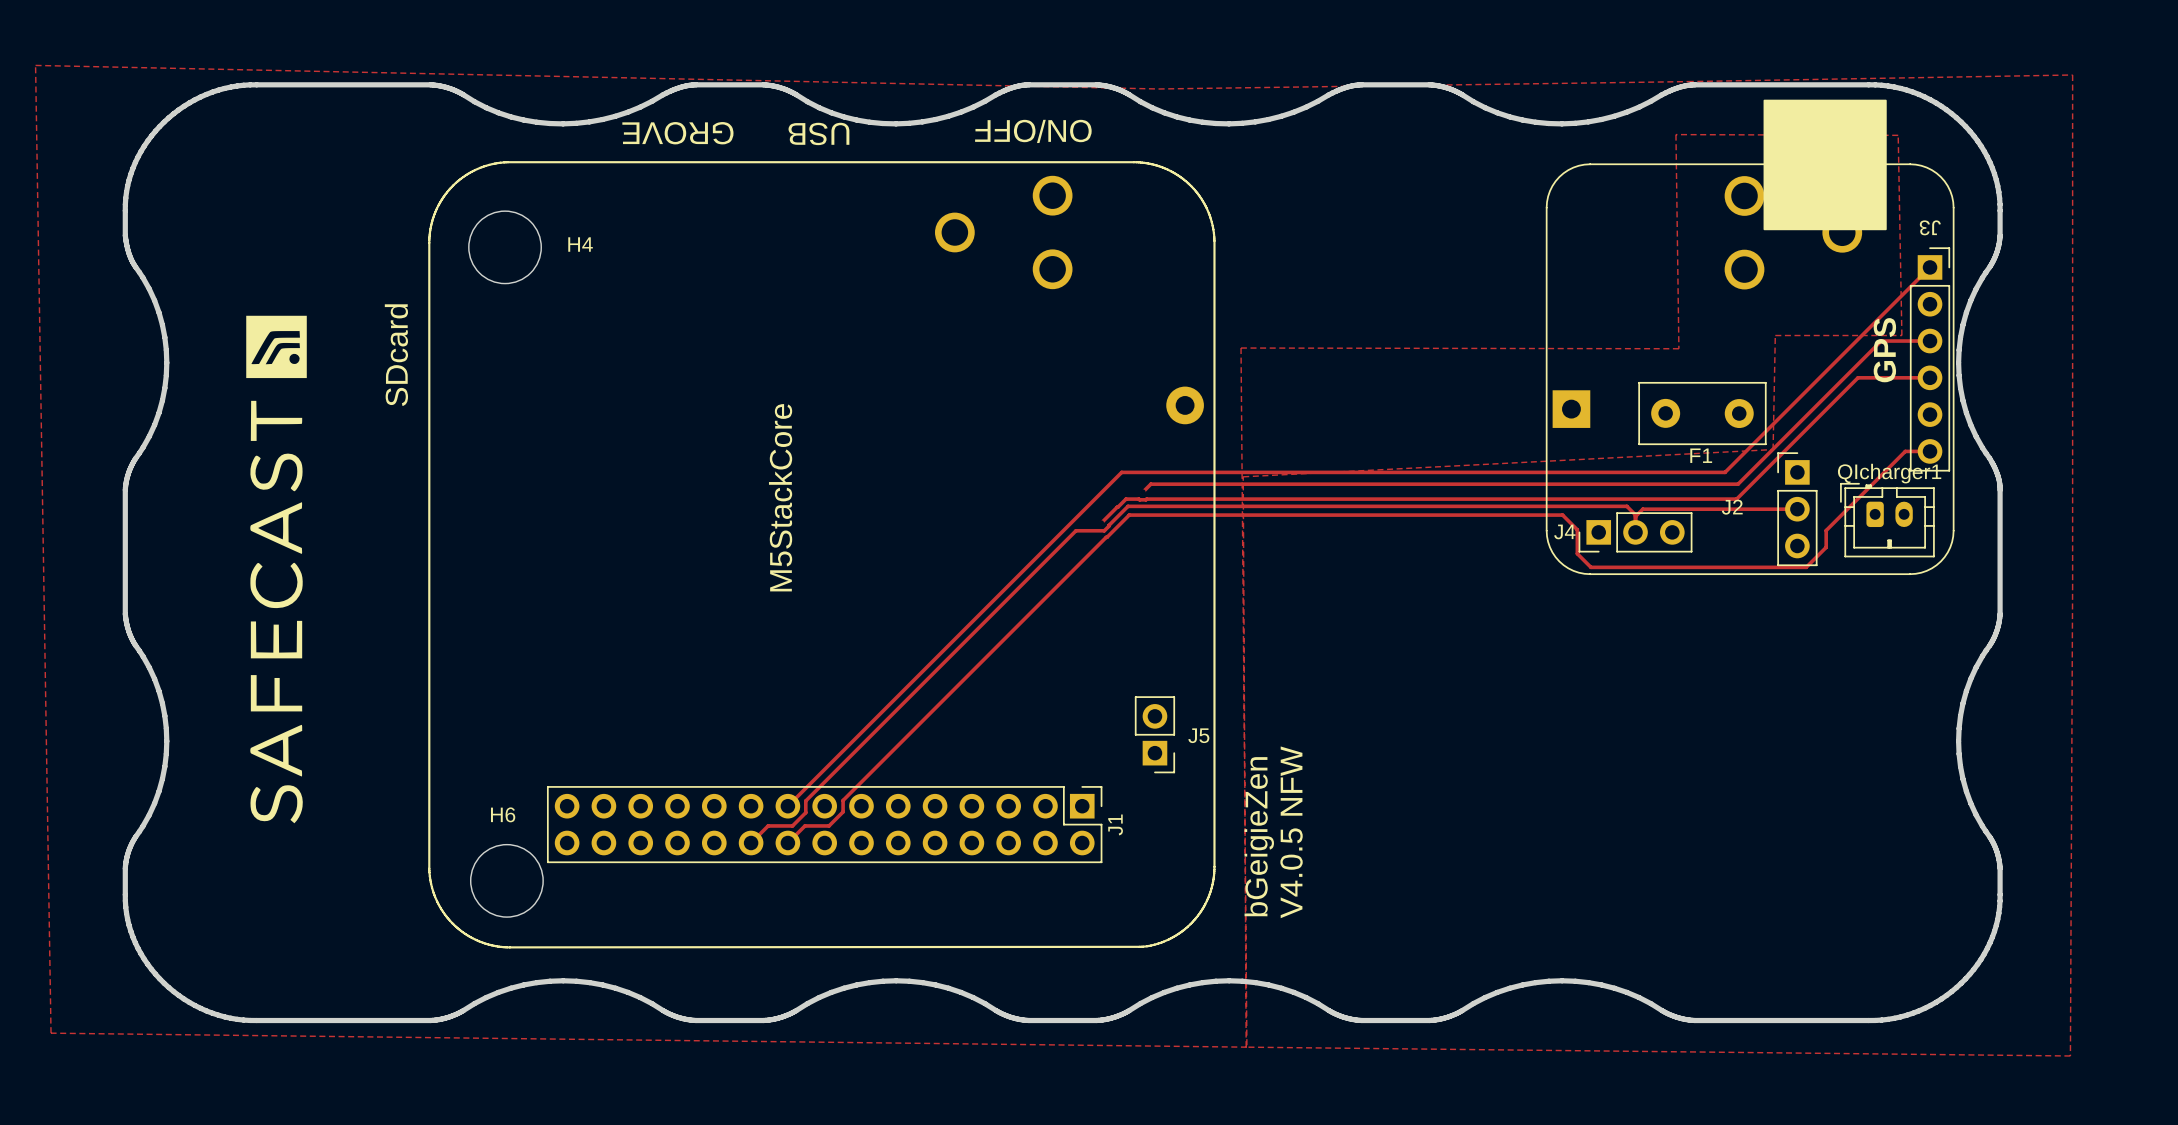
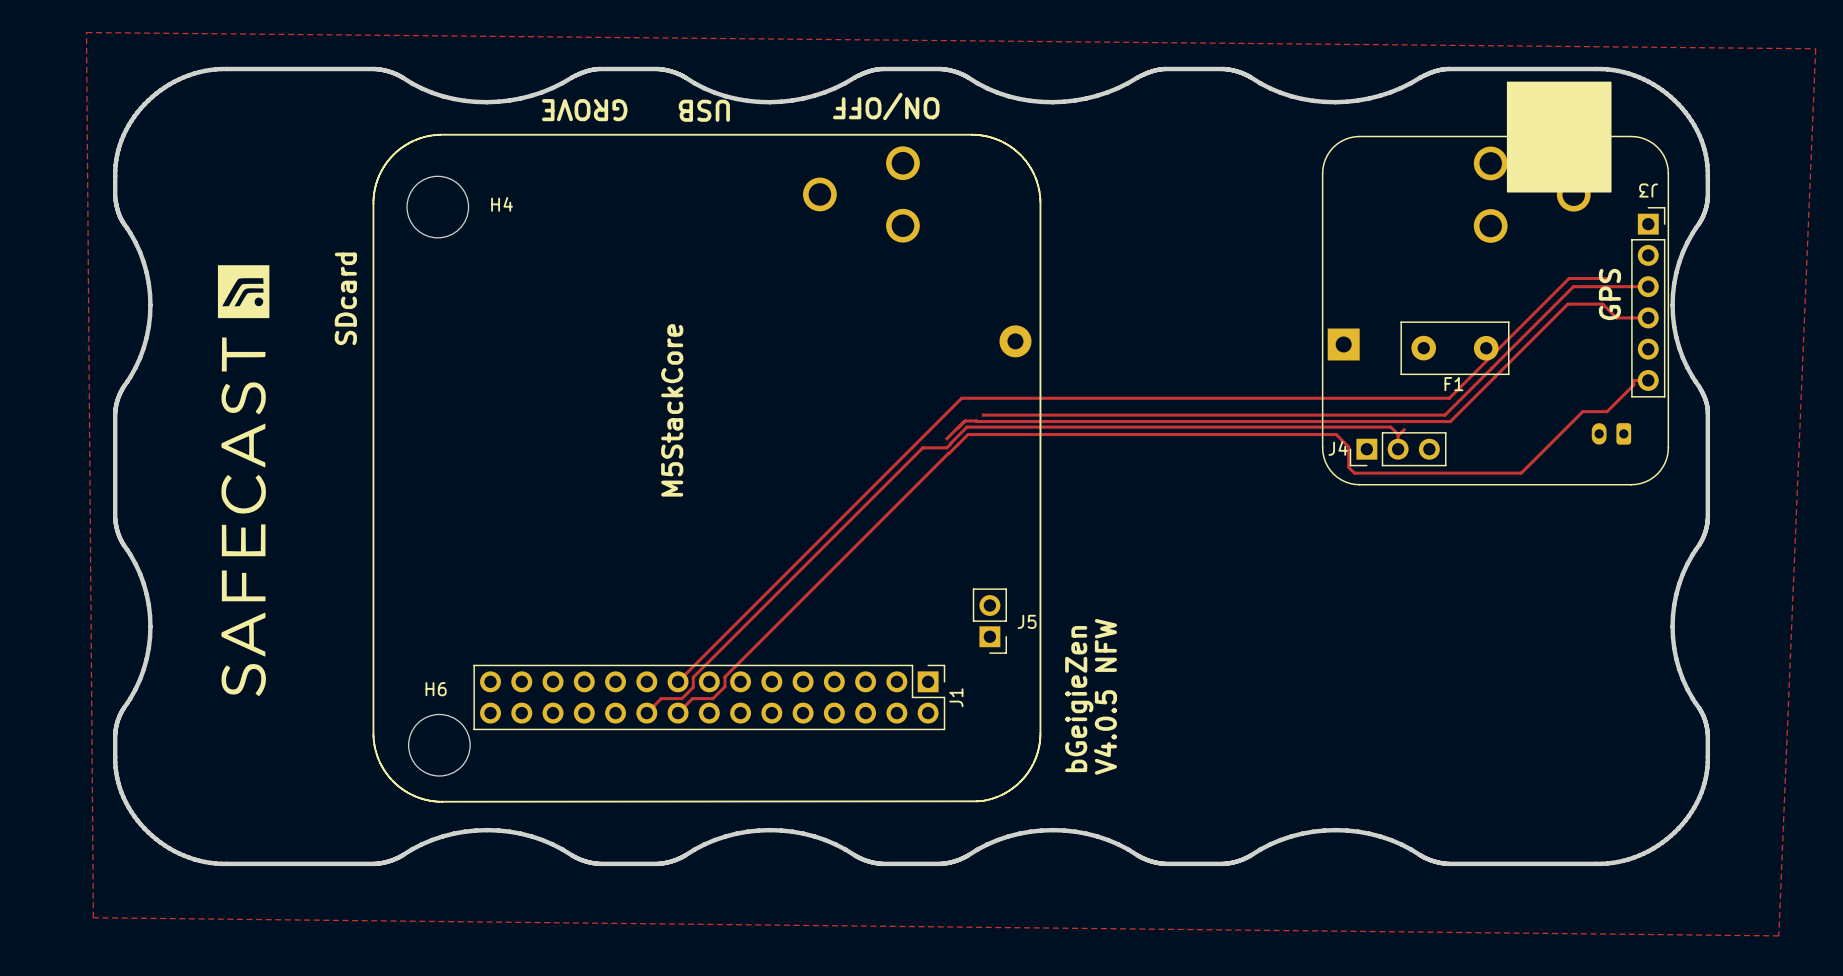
zone outline: (35, 65) (51, 1033) (1246, 1047) (1241, 348) (1678, 348) (1675, 134) (1898, 135) (1901, 335) (1775, 335) (1773, 449) (1243, 476) (1246, 1047) (2070, 1055) (2072, 75) (1158, 88) (35, 65) -> (86, 32) (93, 917) (1778, 935) (1815, 48) (86, 32)
track: (1930, 267) (1725, 472) (1695, 472) -> (1608, 279) (1569, 278) (1449, 398)
track: (1881, 341) (1738, 484) (1150, 484) (1142, 492) -> (1606, 286) (1573, 286) (1445, 415) (979, 415)
track: (1892, 377) (1857, 377) (1736, 499) (1145, 499) -> (1616, 317) (1602, 304) (1567, 304) (1450, 421) (982, 421)
track: (1912, 451) (1905, 451) (1826, 530) (1826, 547) (1806, 567) (1590, 567) (1577, 553) -> (1633, 380) (1633, 384) (1607, 411) (1582, 411) (1521, 473) (1354, 473) (1348, 467)
track: (1797, 509) (1642, 509) (1635, 516) -> (1404, 429) (1398, 435)
J2: (1797, 509) -> none
QIcharger1 side: top (1887, 520) -> bottom (1611, 433)

